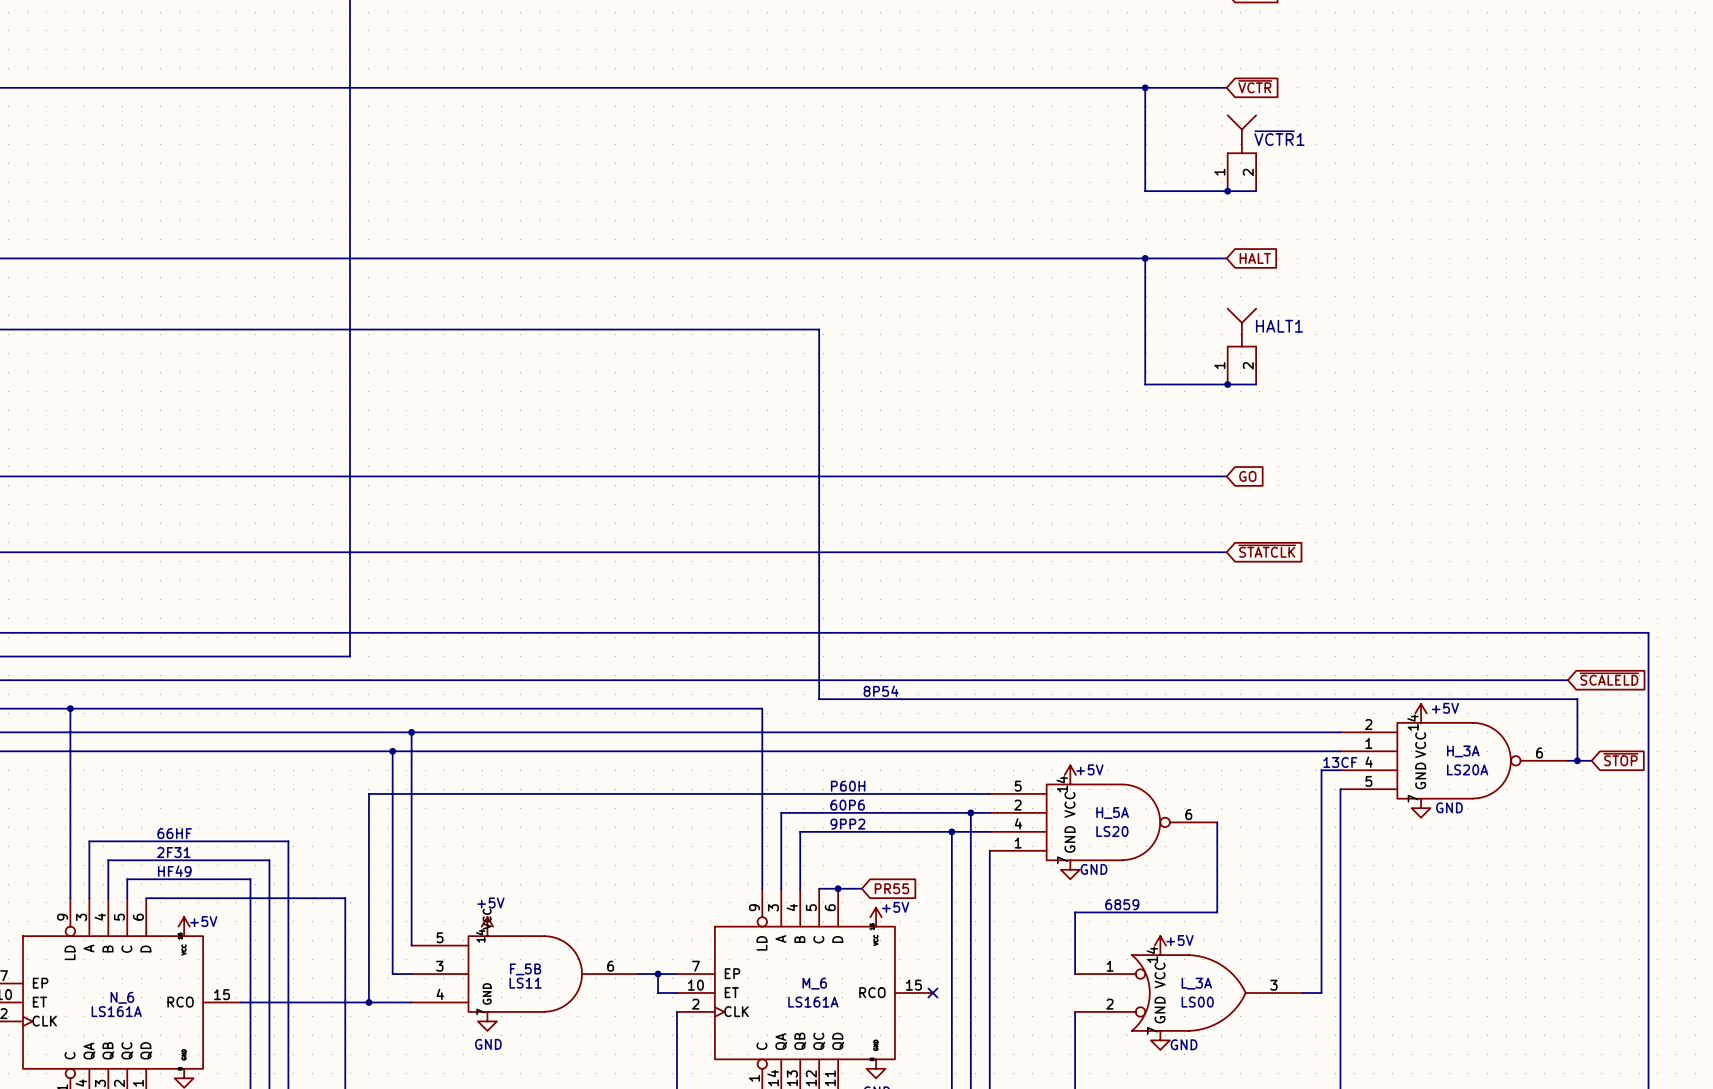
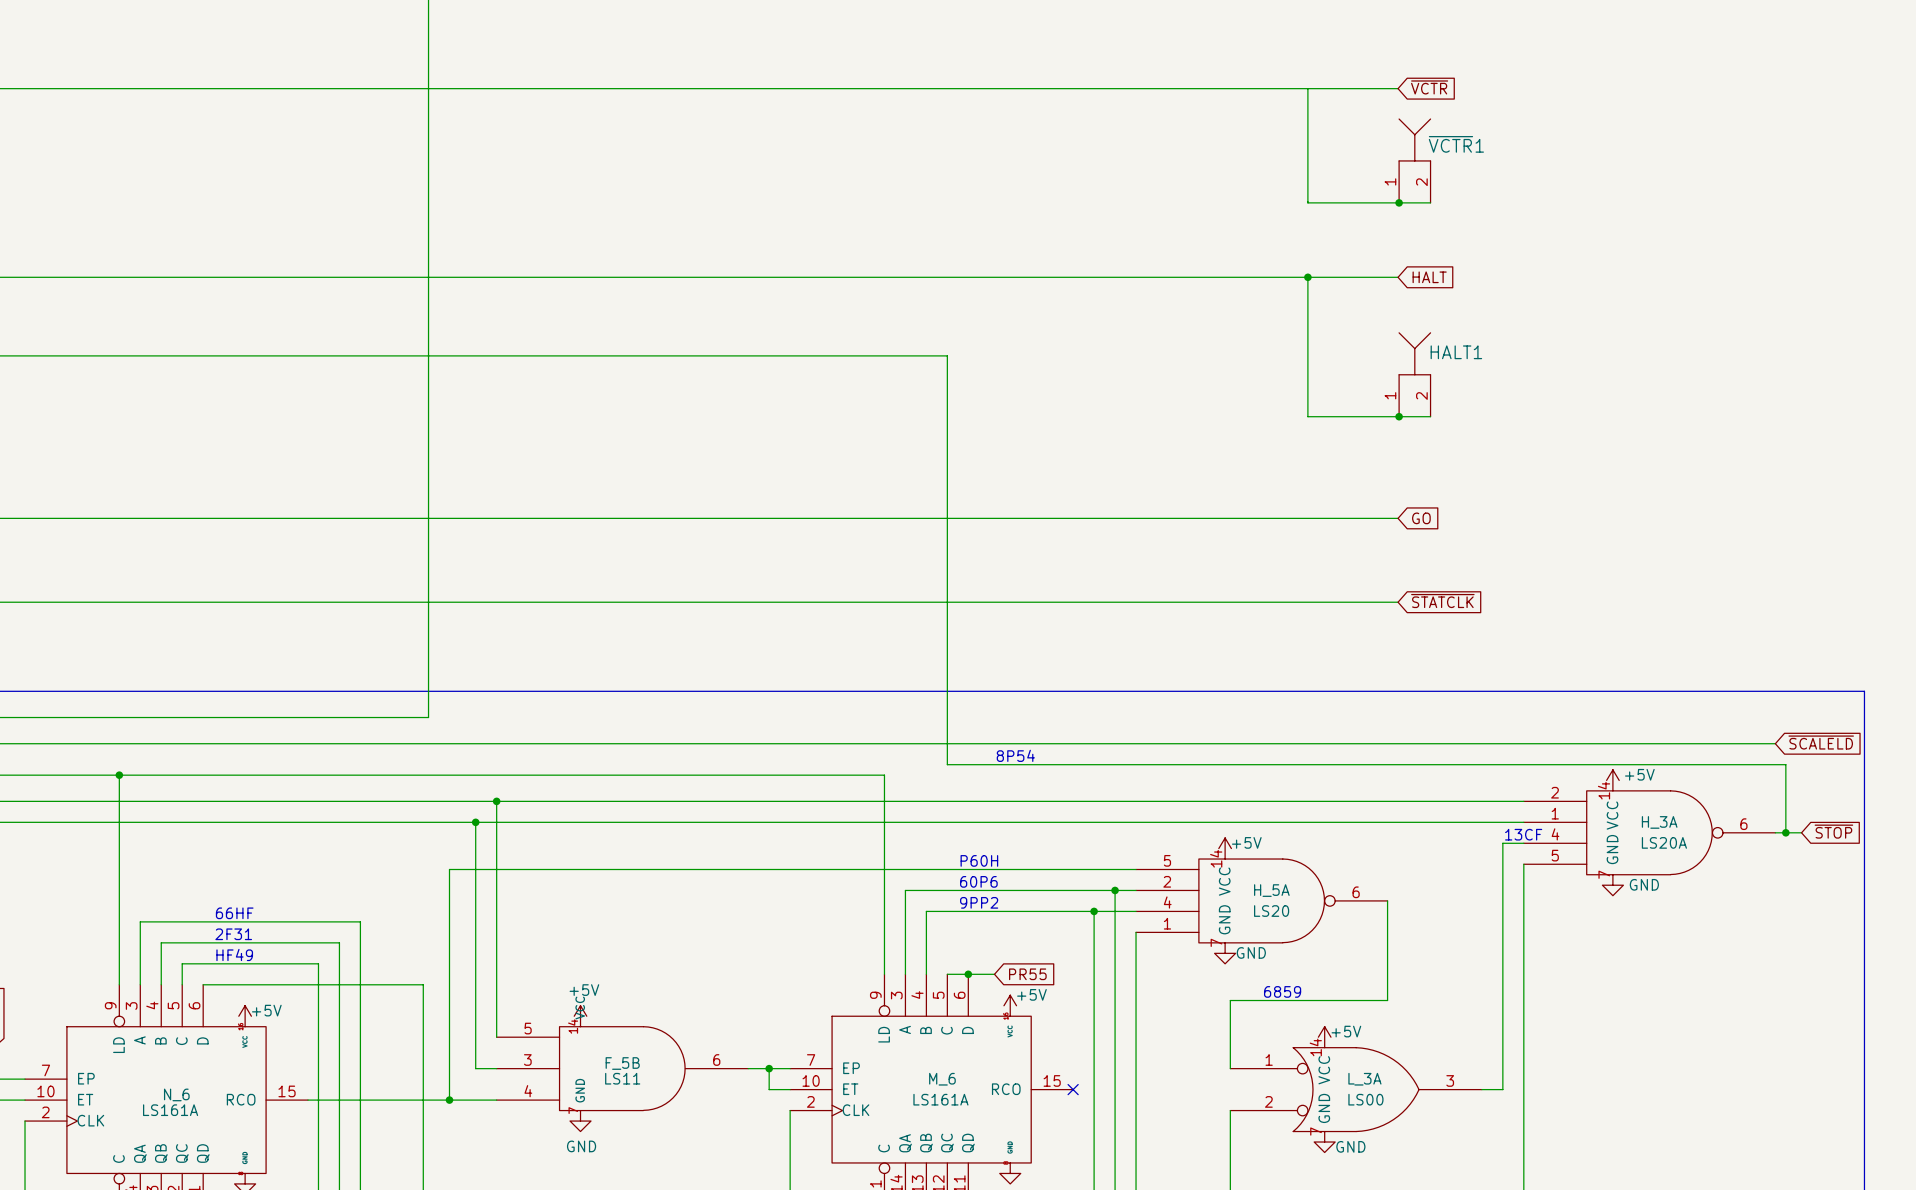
junction: (1145, 87) -> none

